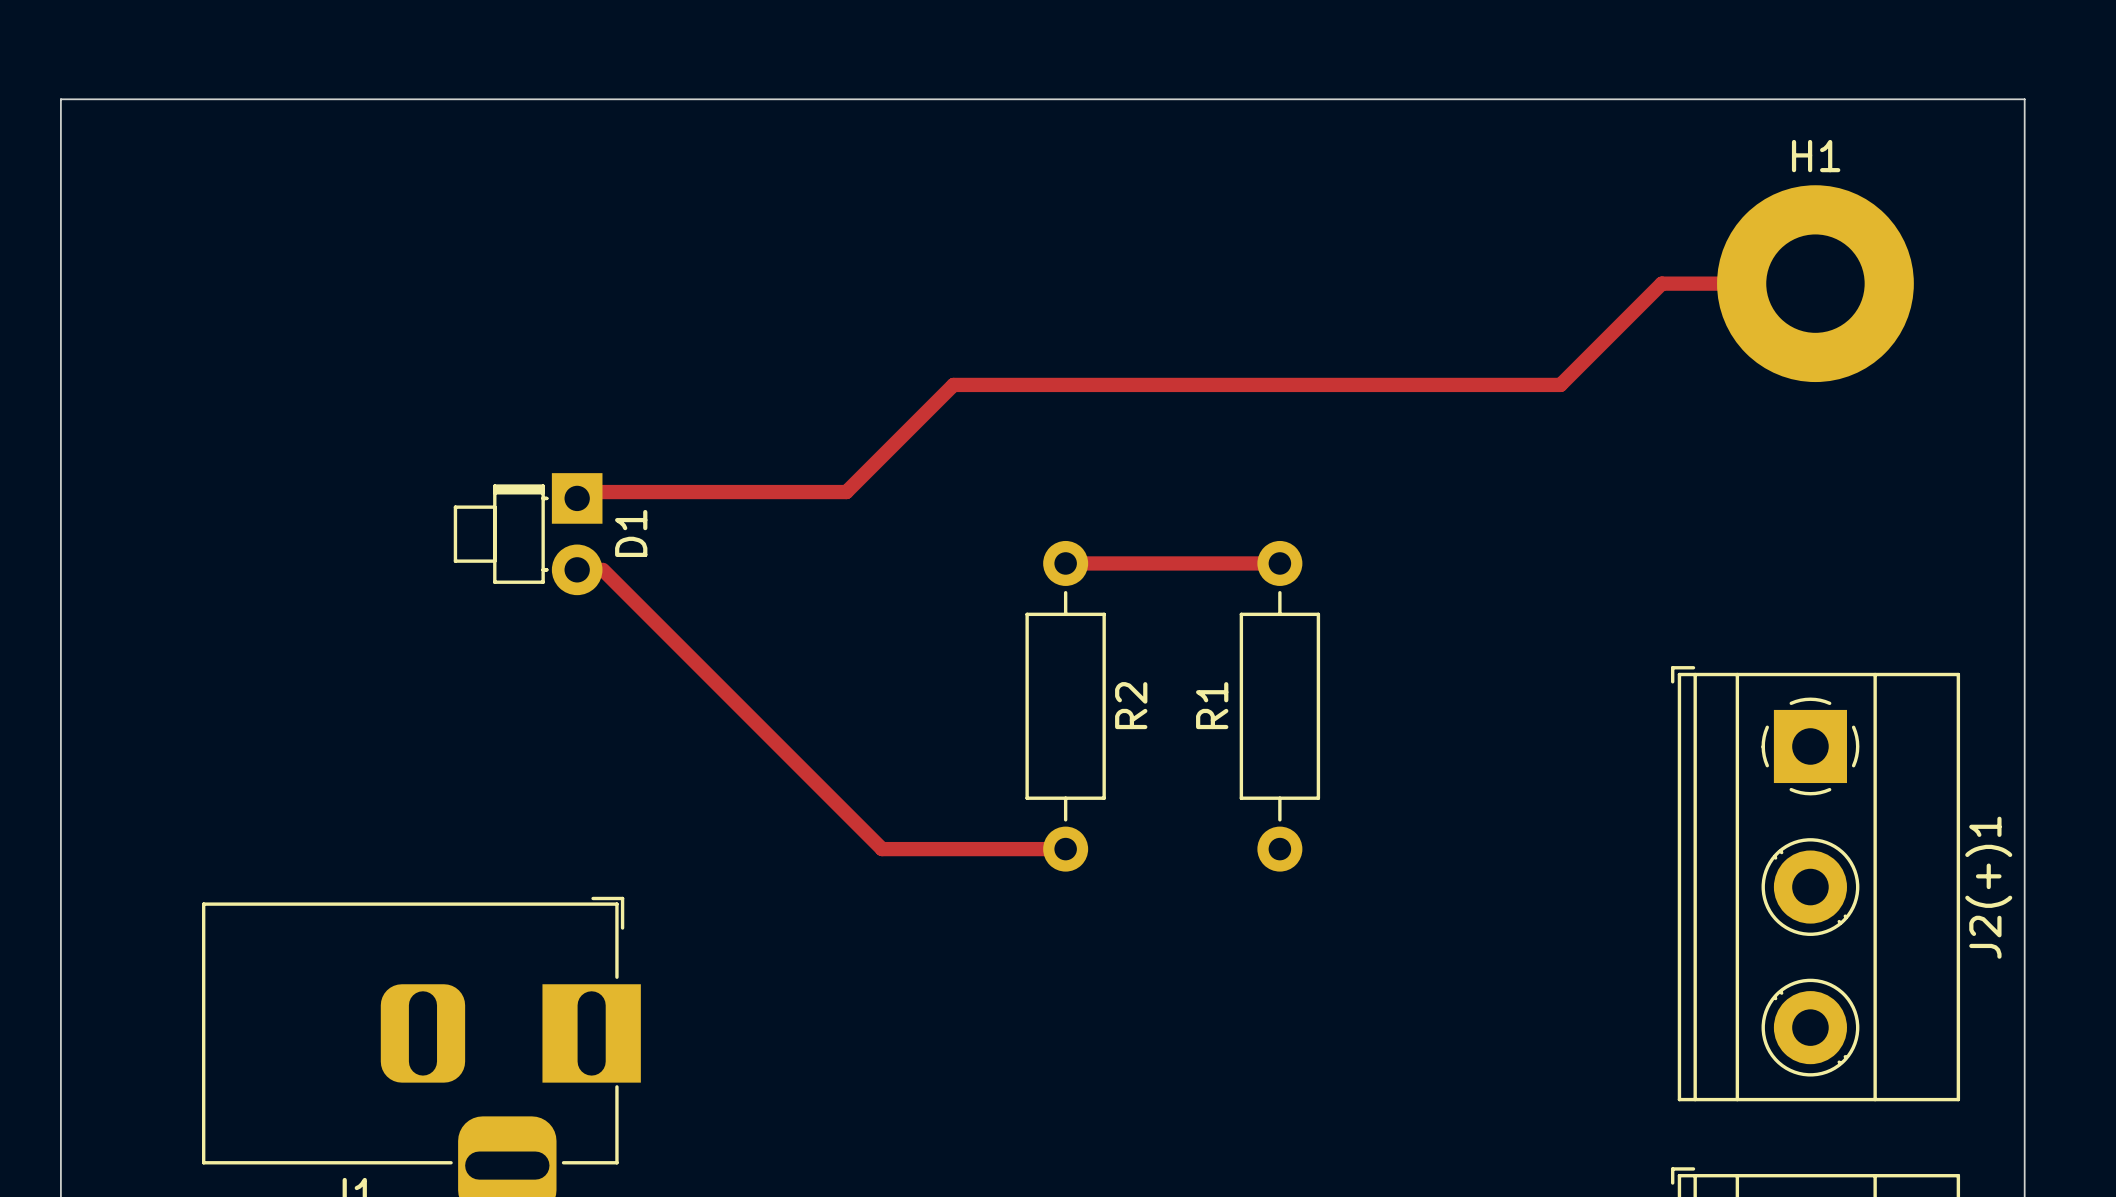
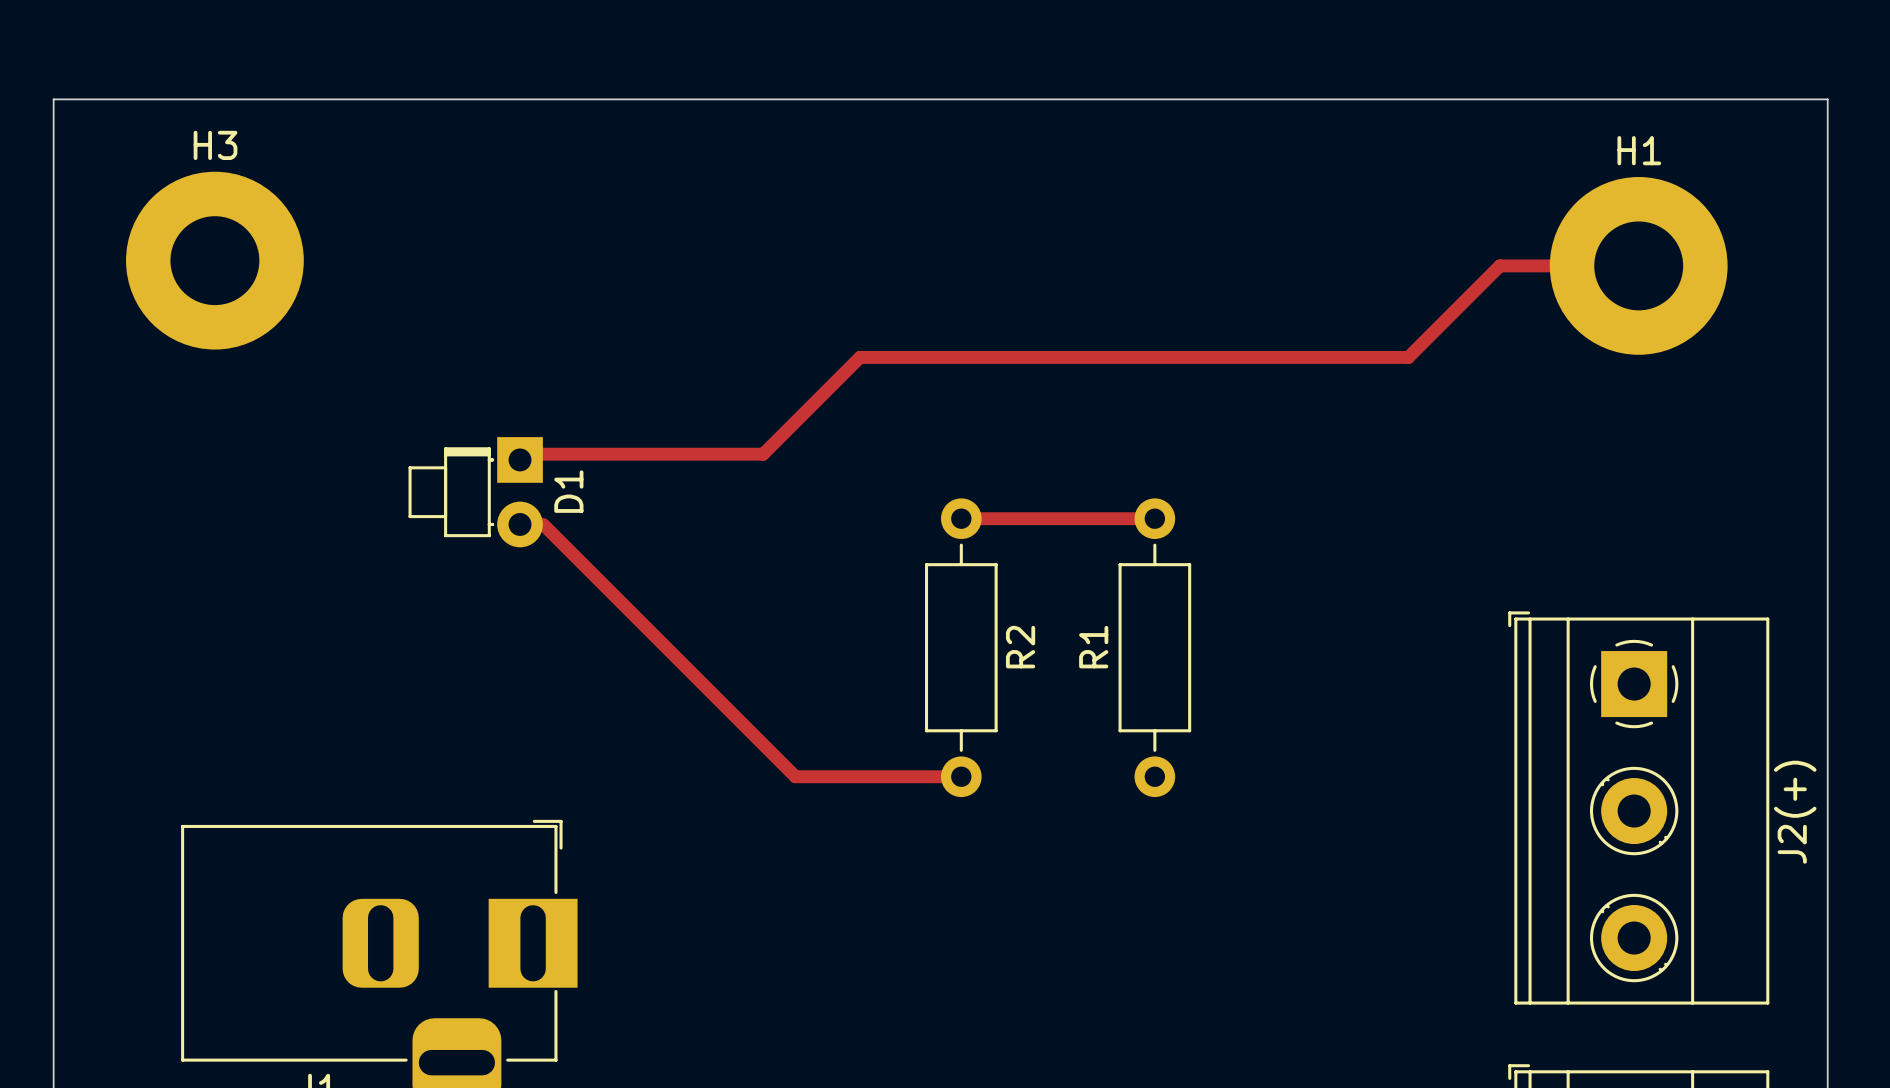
H3: none -> (214, 260)
J2(+)1 name: J2(+)1 (1988, 887) -> J2(+) (1795, 812)

